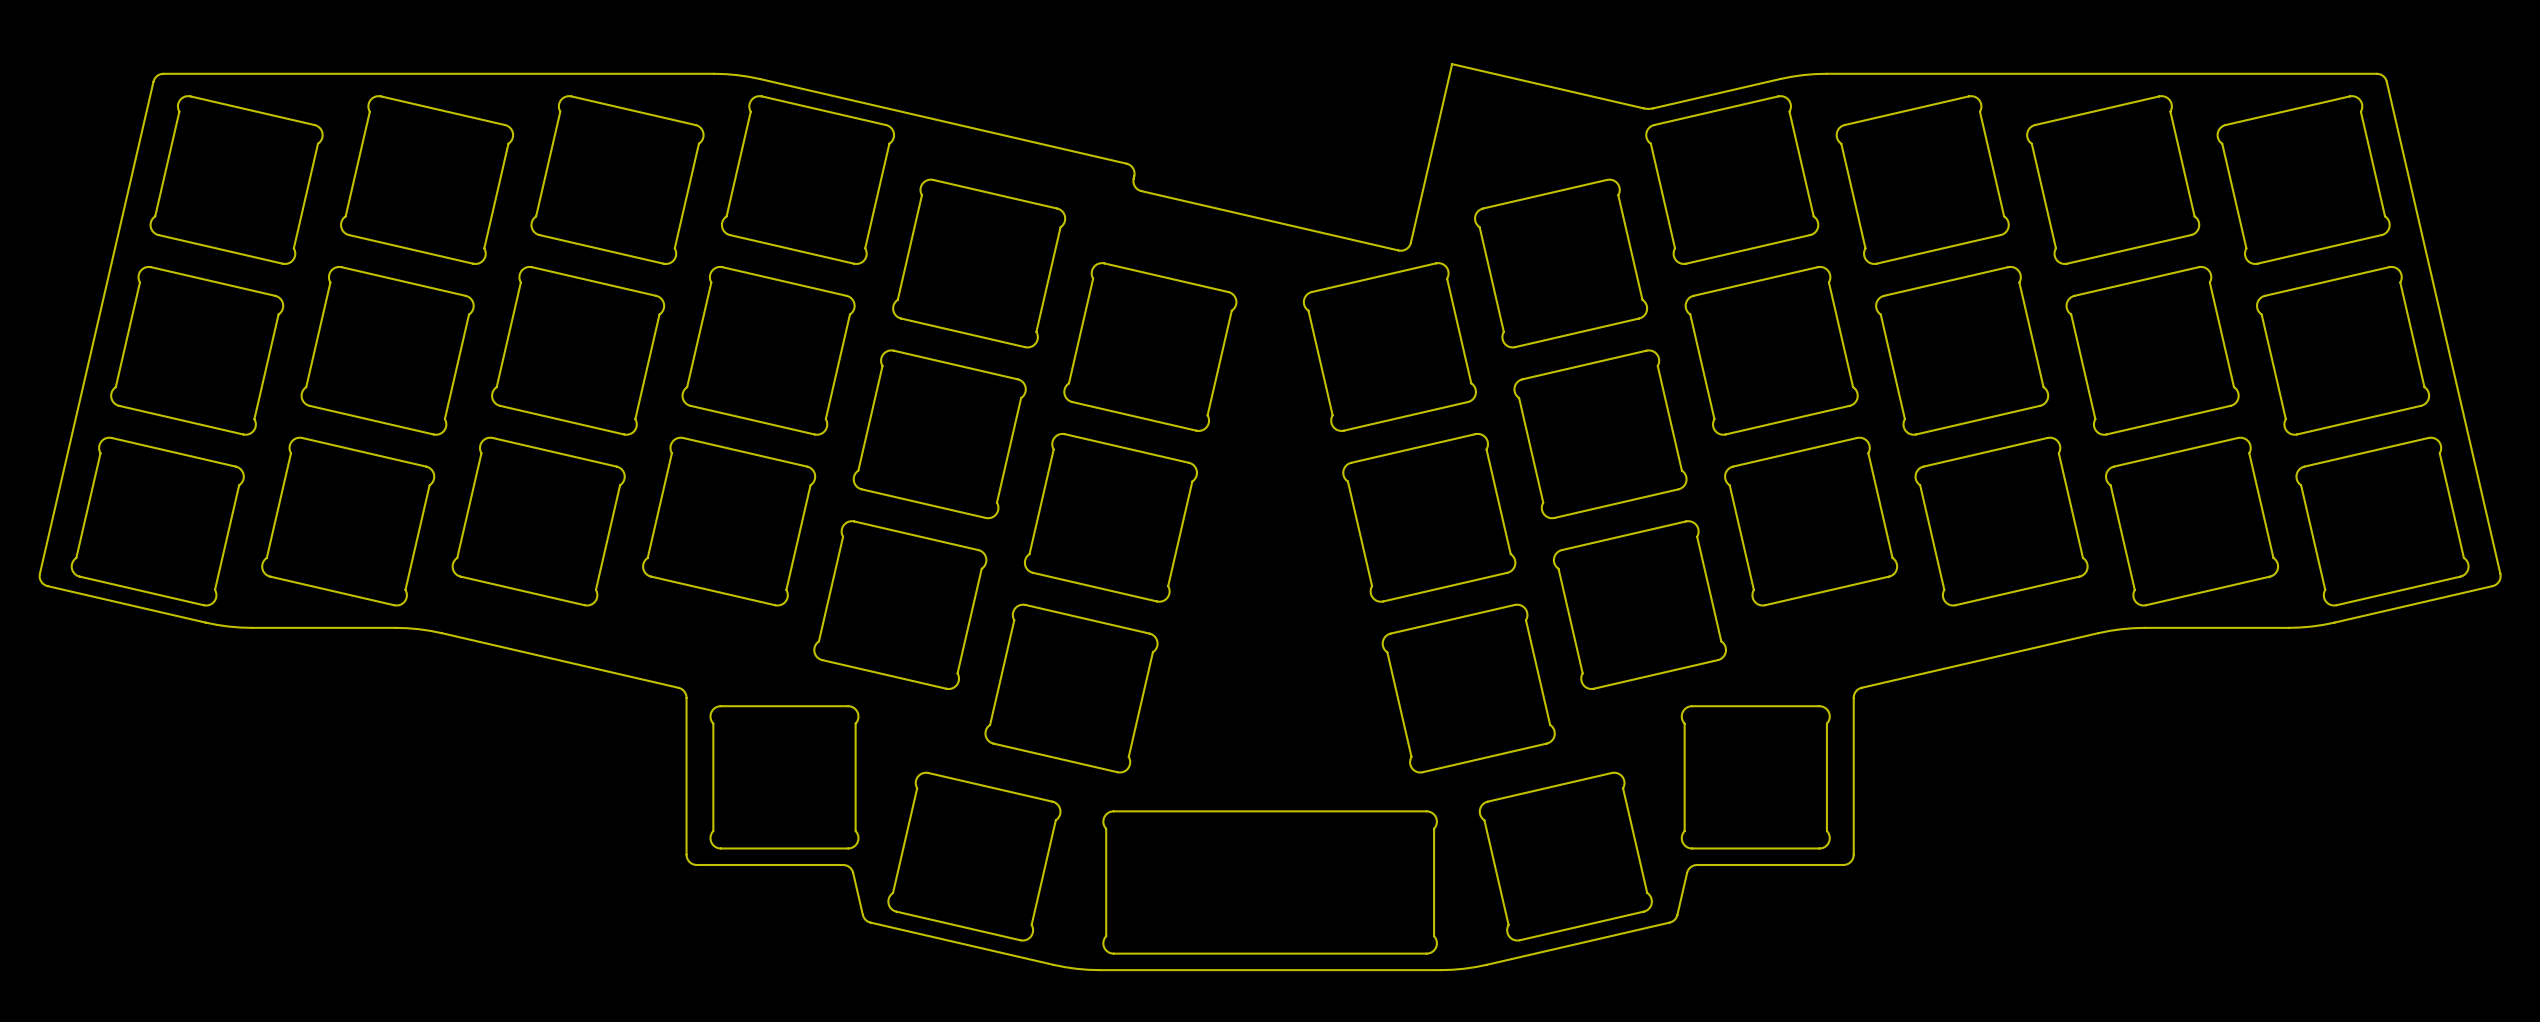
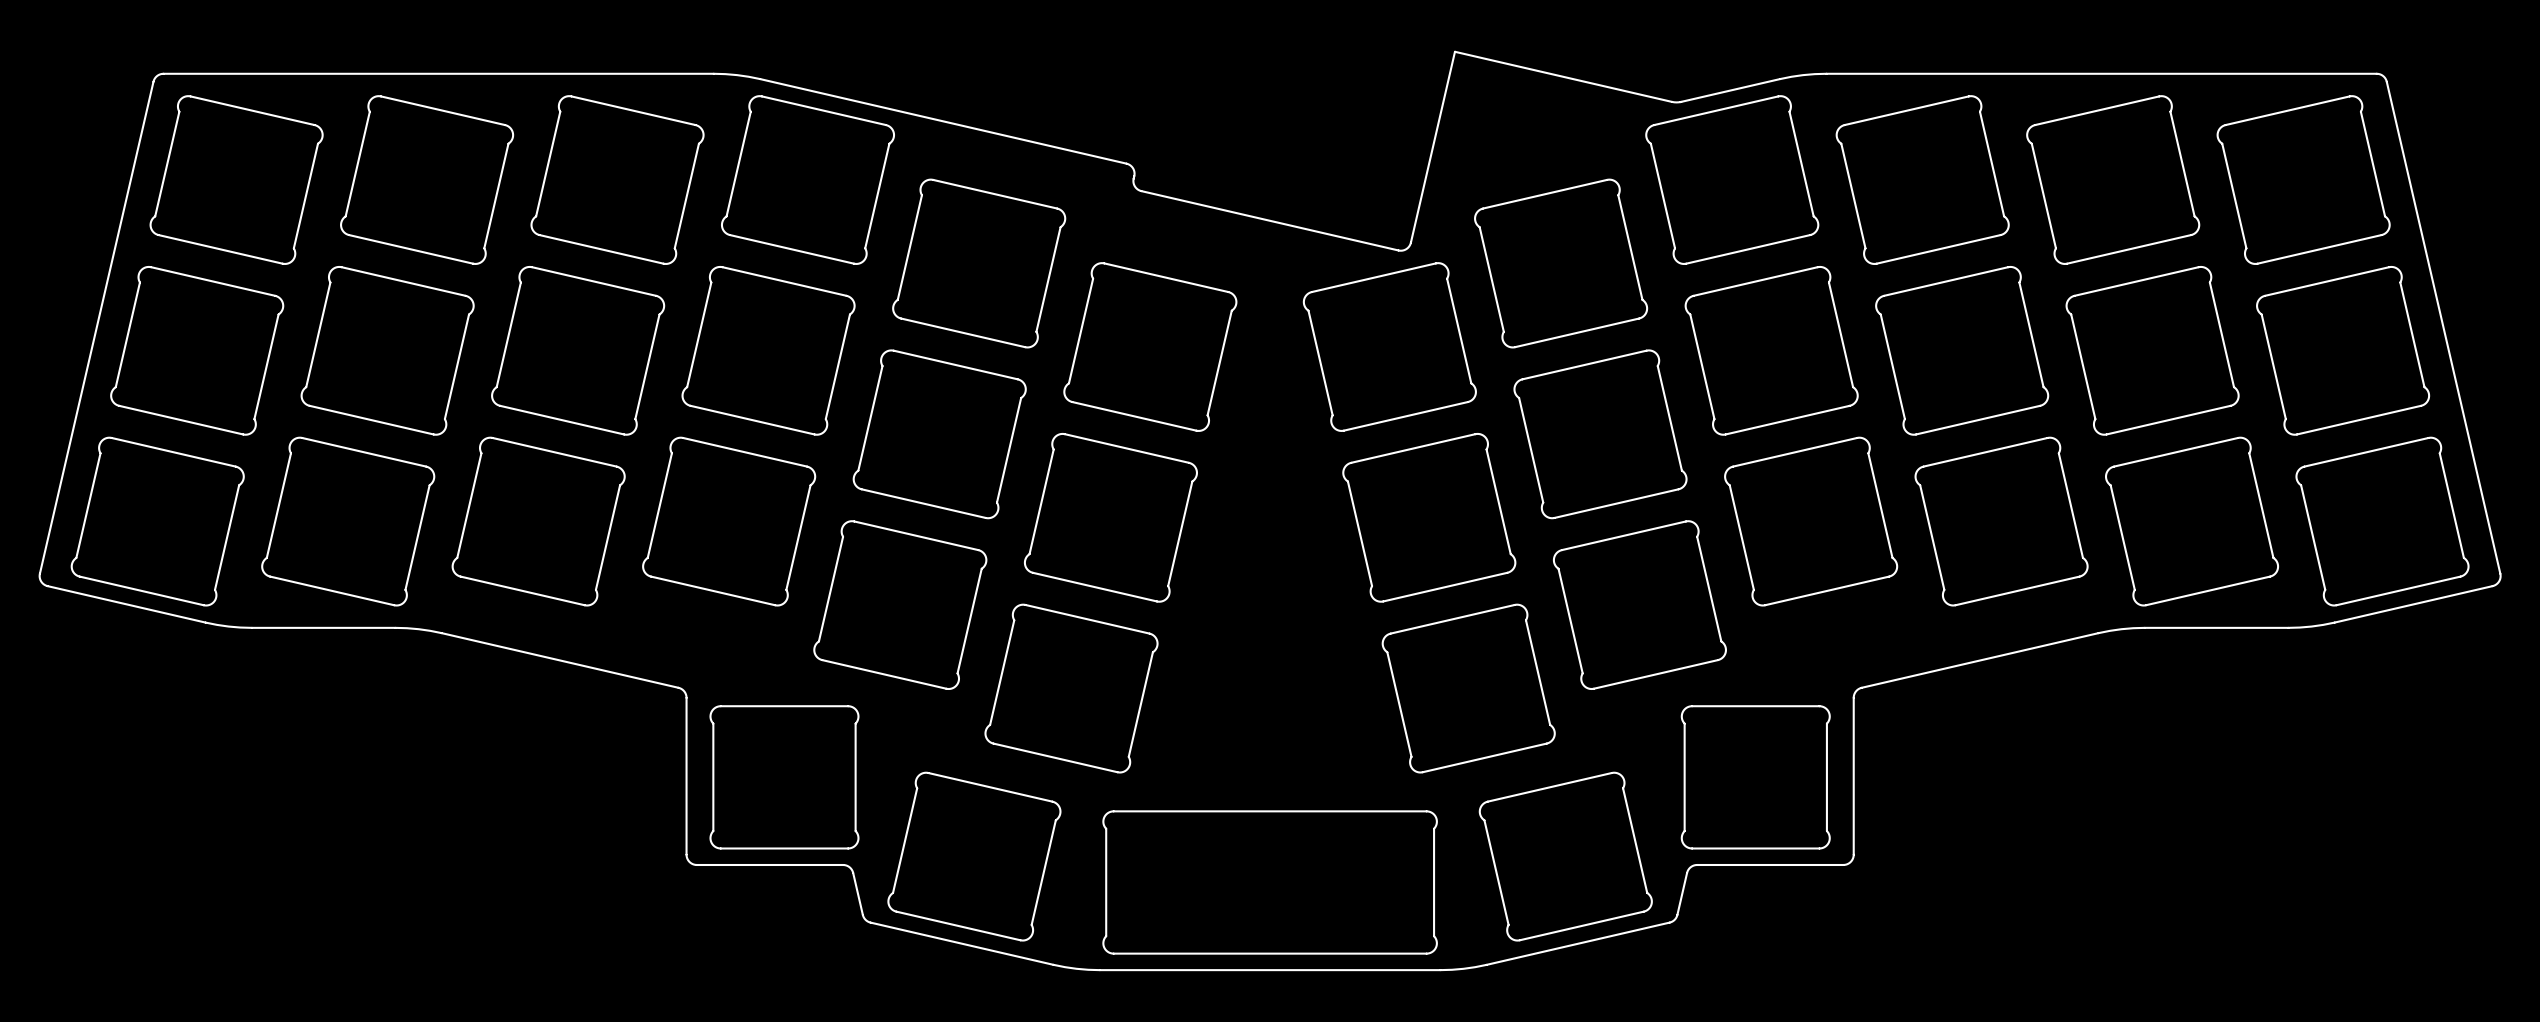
drawing shape: [38, 63, 2502, 972] -> [38, 50, 2502, 972]

